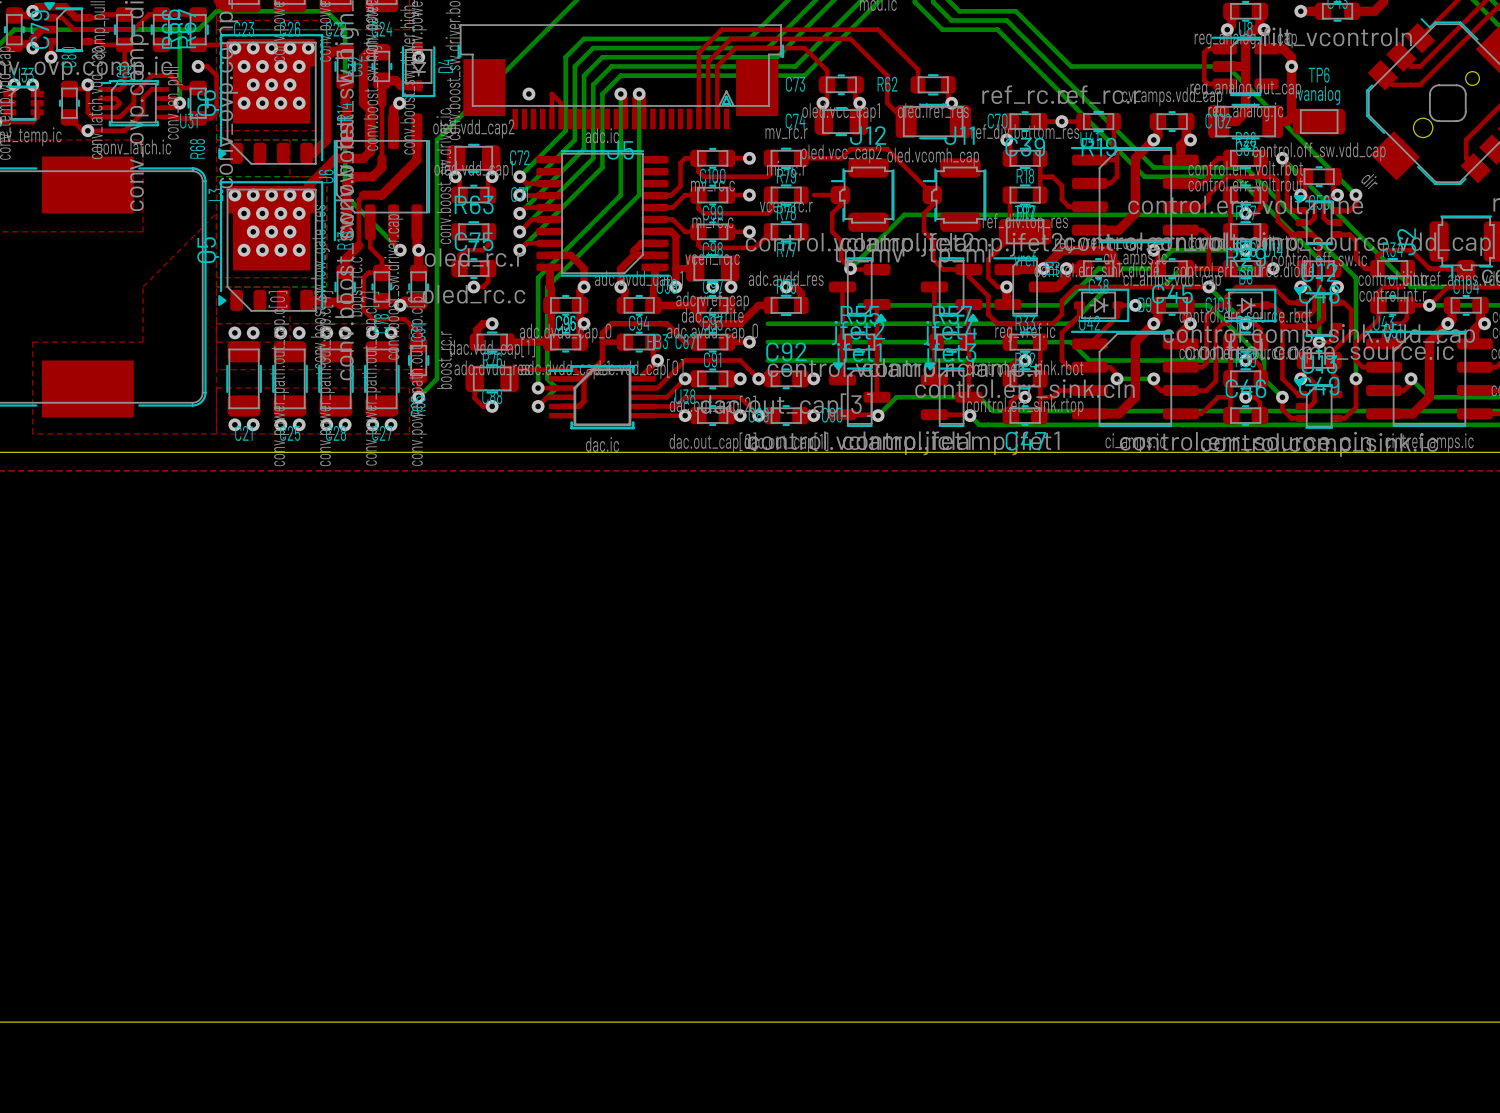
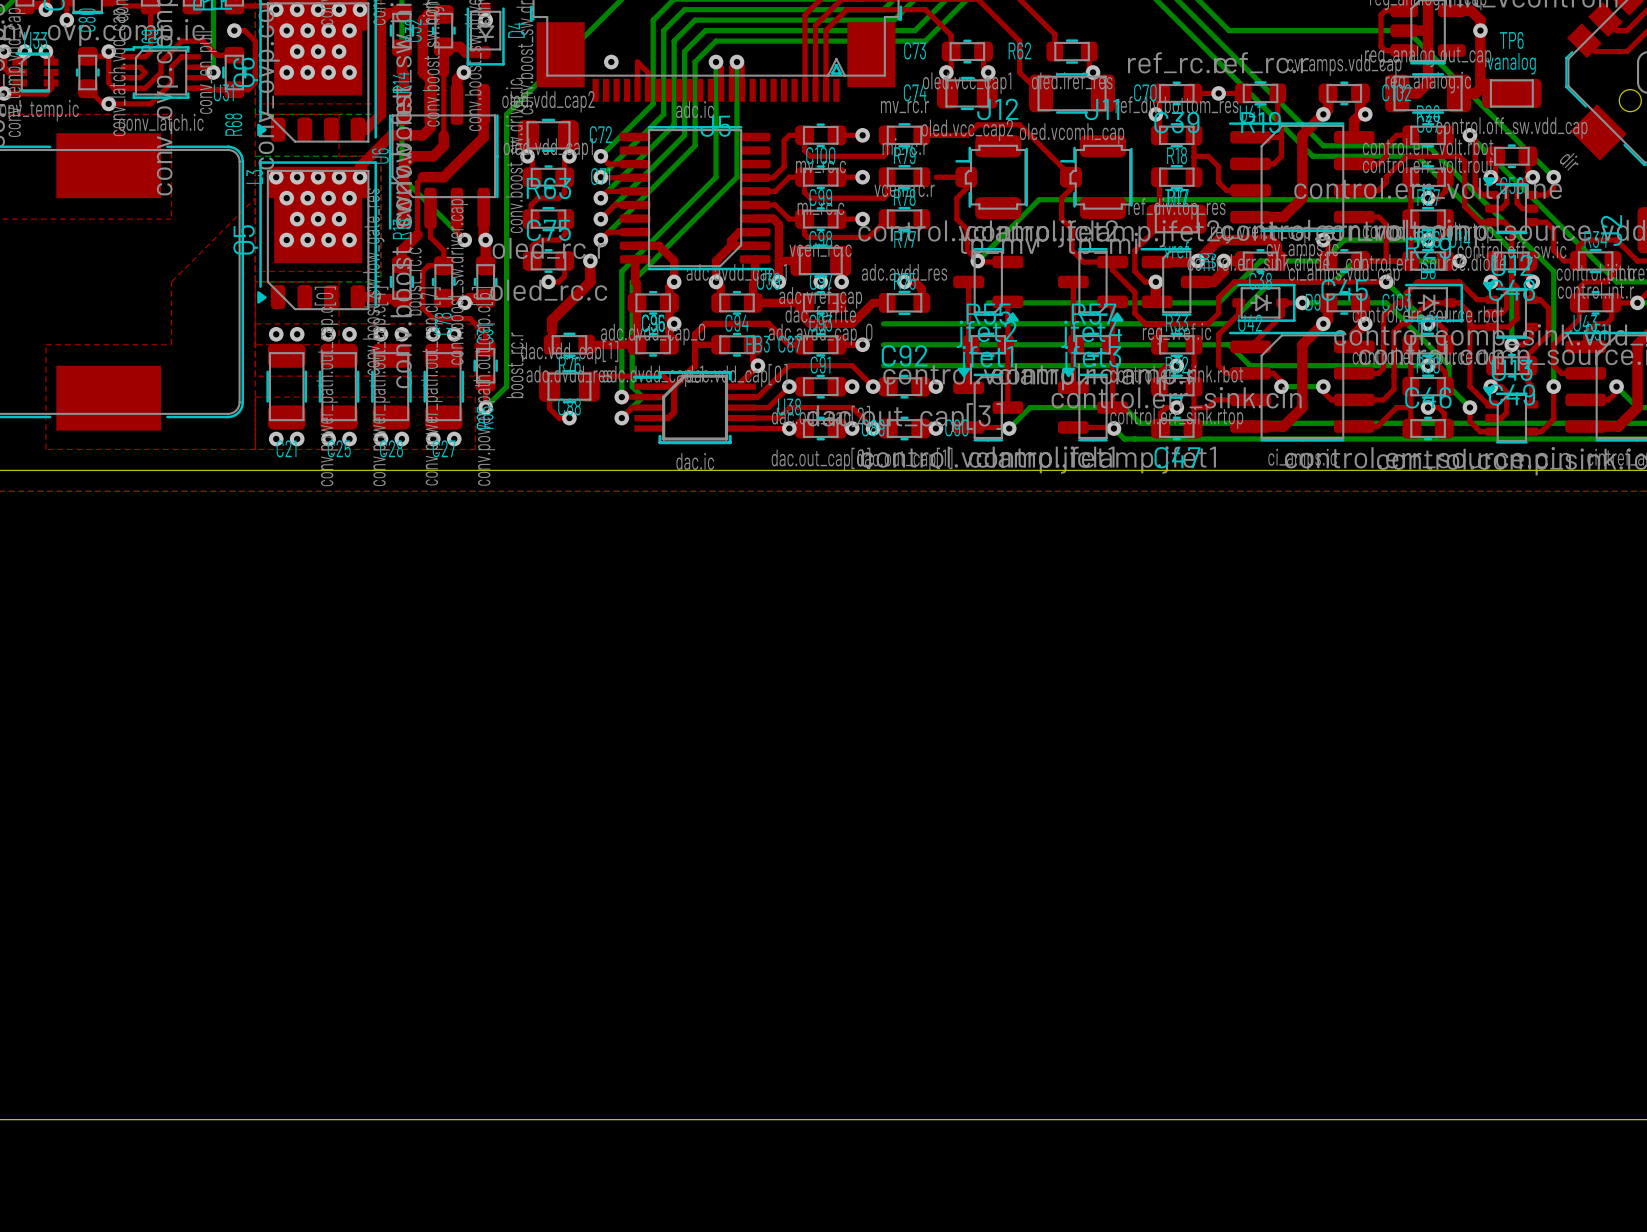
top track: none -> (564, 177) (564, 192) (558, 198) (538, 198) (531, 204) (531, 219)
top track: (492, 323) (482, 323) (477, 329) -> (590, 260) (590, 281) (552, 320) (552, 330)
via position: (492, 323) -> (590, 260)

